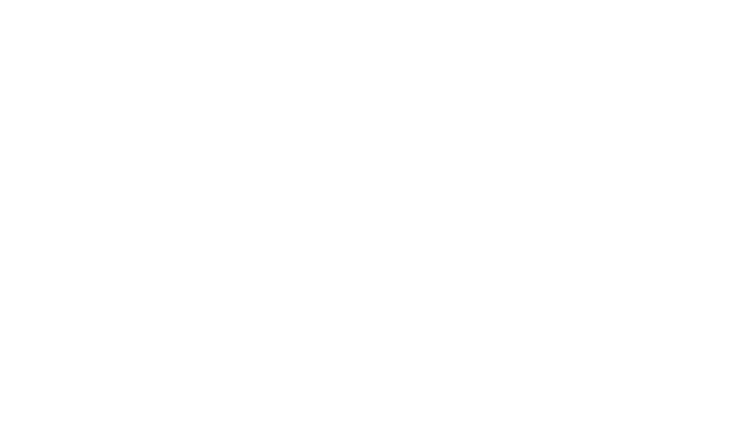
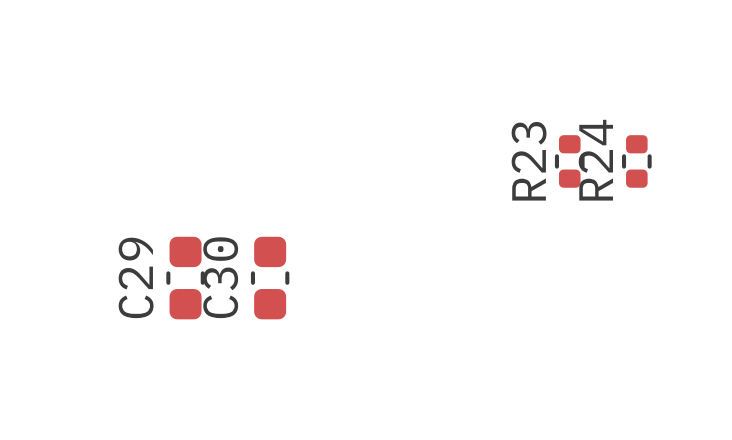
R23: none -> (569, 161)
R24: none -> (636, 161)
C29: none -> (185, 278)
C30: none -> (270, 278)

